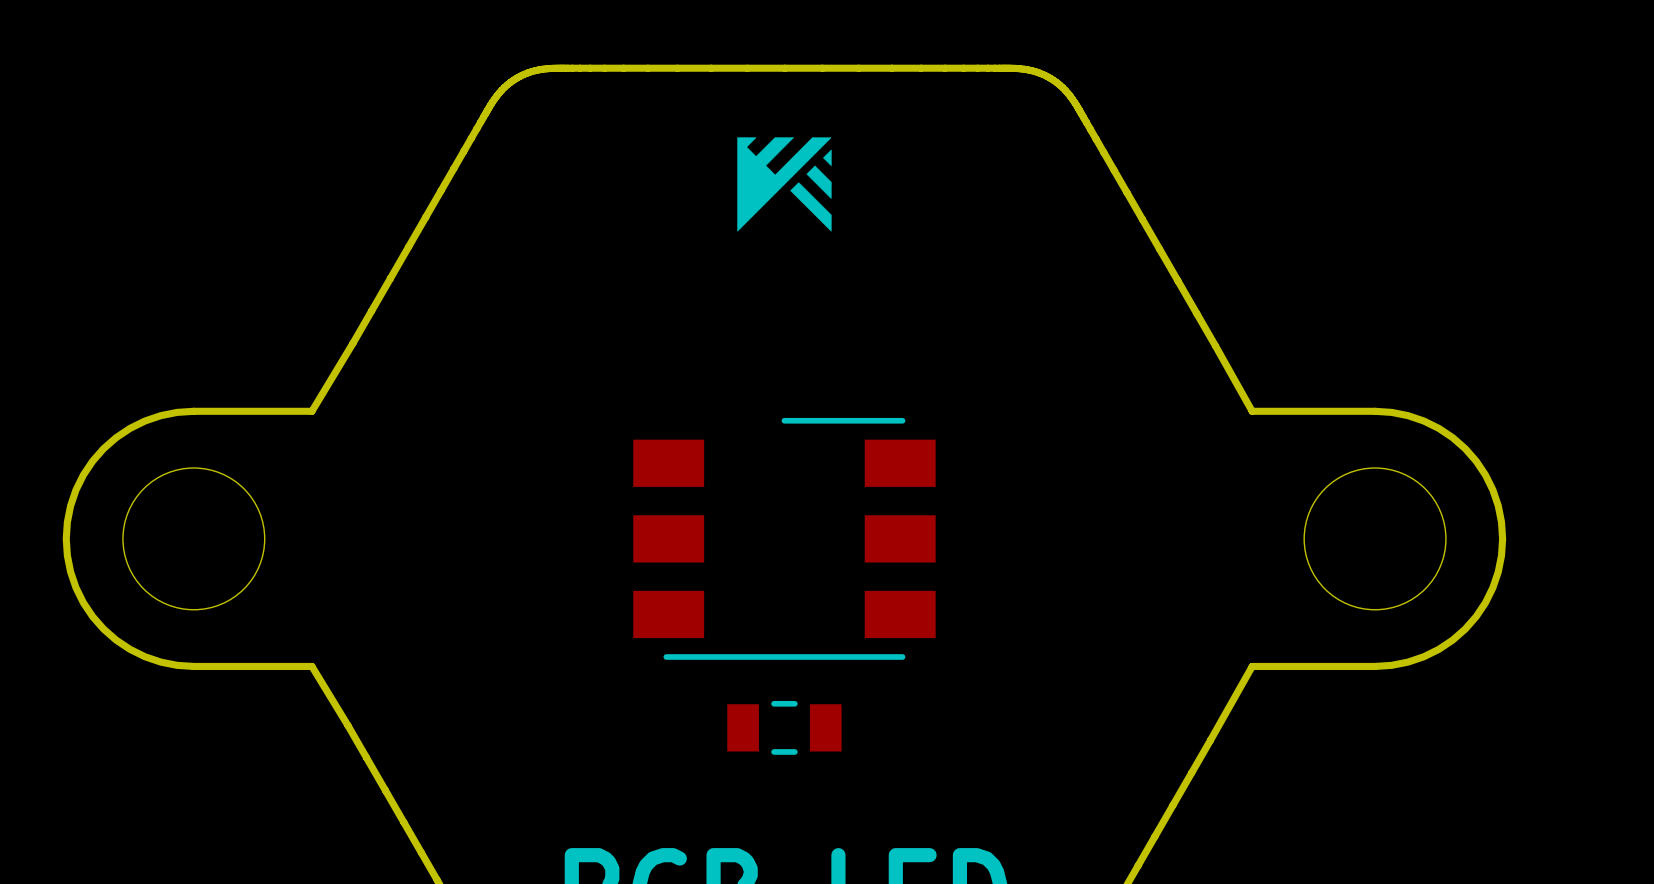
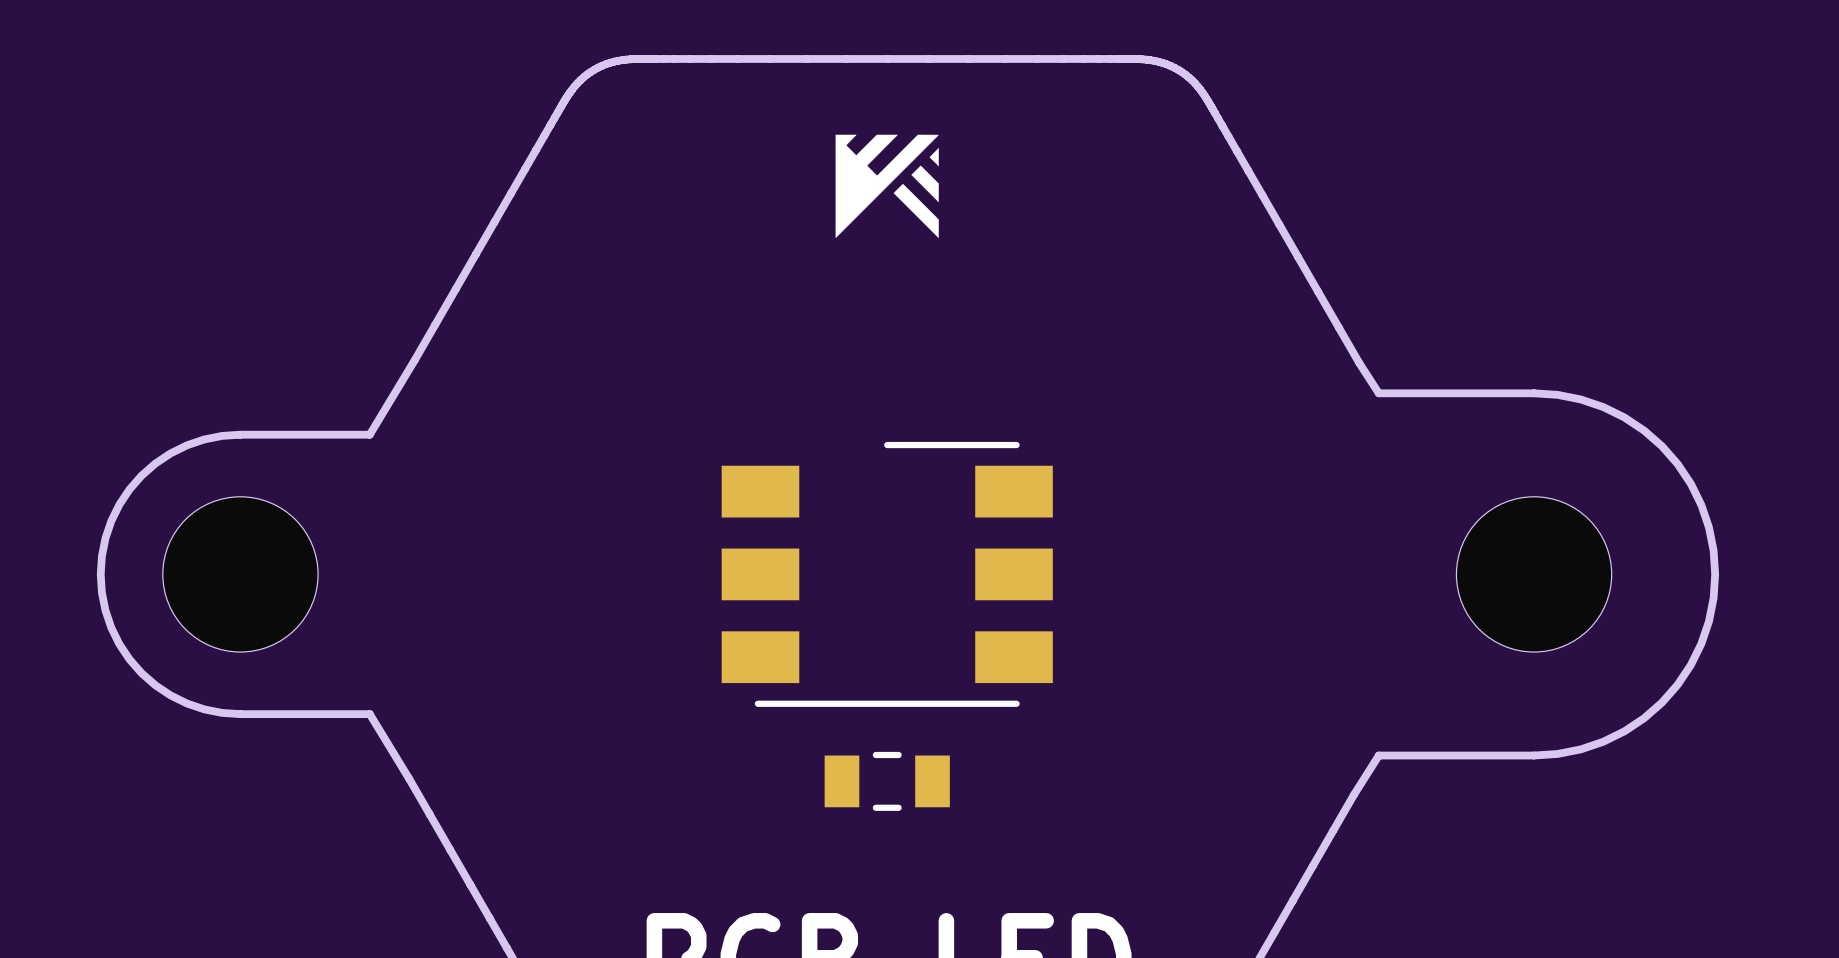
board edge: (1215, 345) (1252, 411) (1391, 412) (1423, 421) (1452, 437) (1476, 461) (1492, 490) (1501, 522) (1502, 538) (1501, 555) (1492, 587) (1476, 616) (1452, 640) (1423, 656) (1391, 665) (1252, 666) (1210, 740) -> (1359, 363) (1378, 393) (1557, 394) (1580, 399) (1603, 407) (1624, 417) (1644, 430) (1662, 446) (1677, 464) (1690, 483) (1701, 505) (1708, 527) (1713, 550) (1715, 574) (1713, 598) (1708, 621) (1701, 643) (1690, 664) (1677, 684) (1662, 702) (1644, 718) (1624, 731) (1603, 741) (1580, 749) (1557, 753) (1378, 755) (1353, 794)

